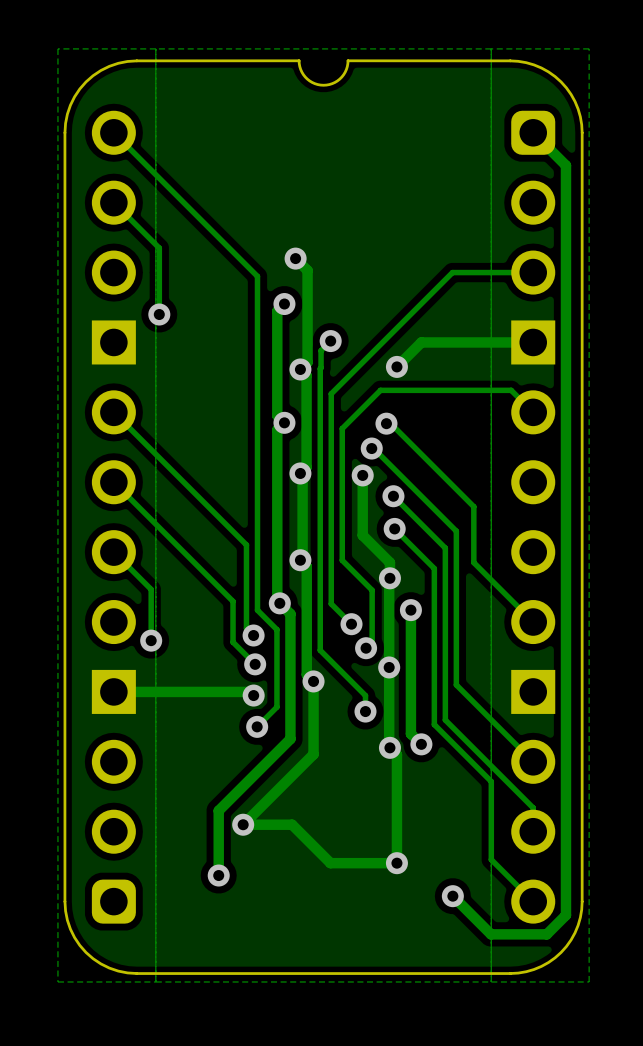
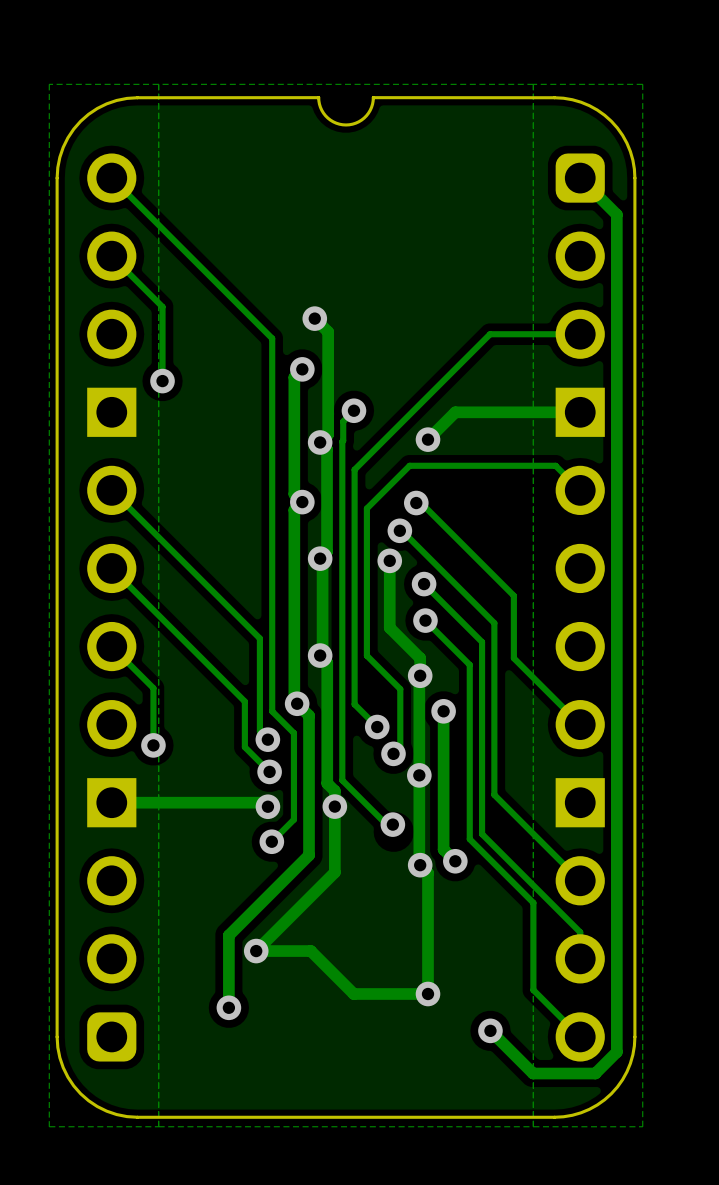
track: (320, 650) (365, 695) (365, 711) -> (342, 756) (342, 780) (393, 831)
via position: (313, 681) -> (334, 806)

